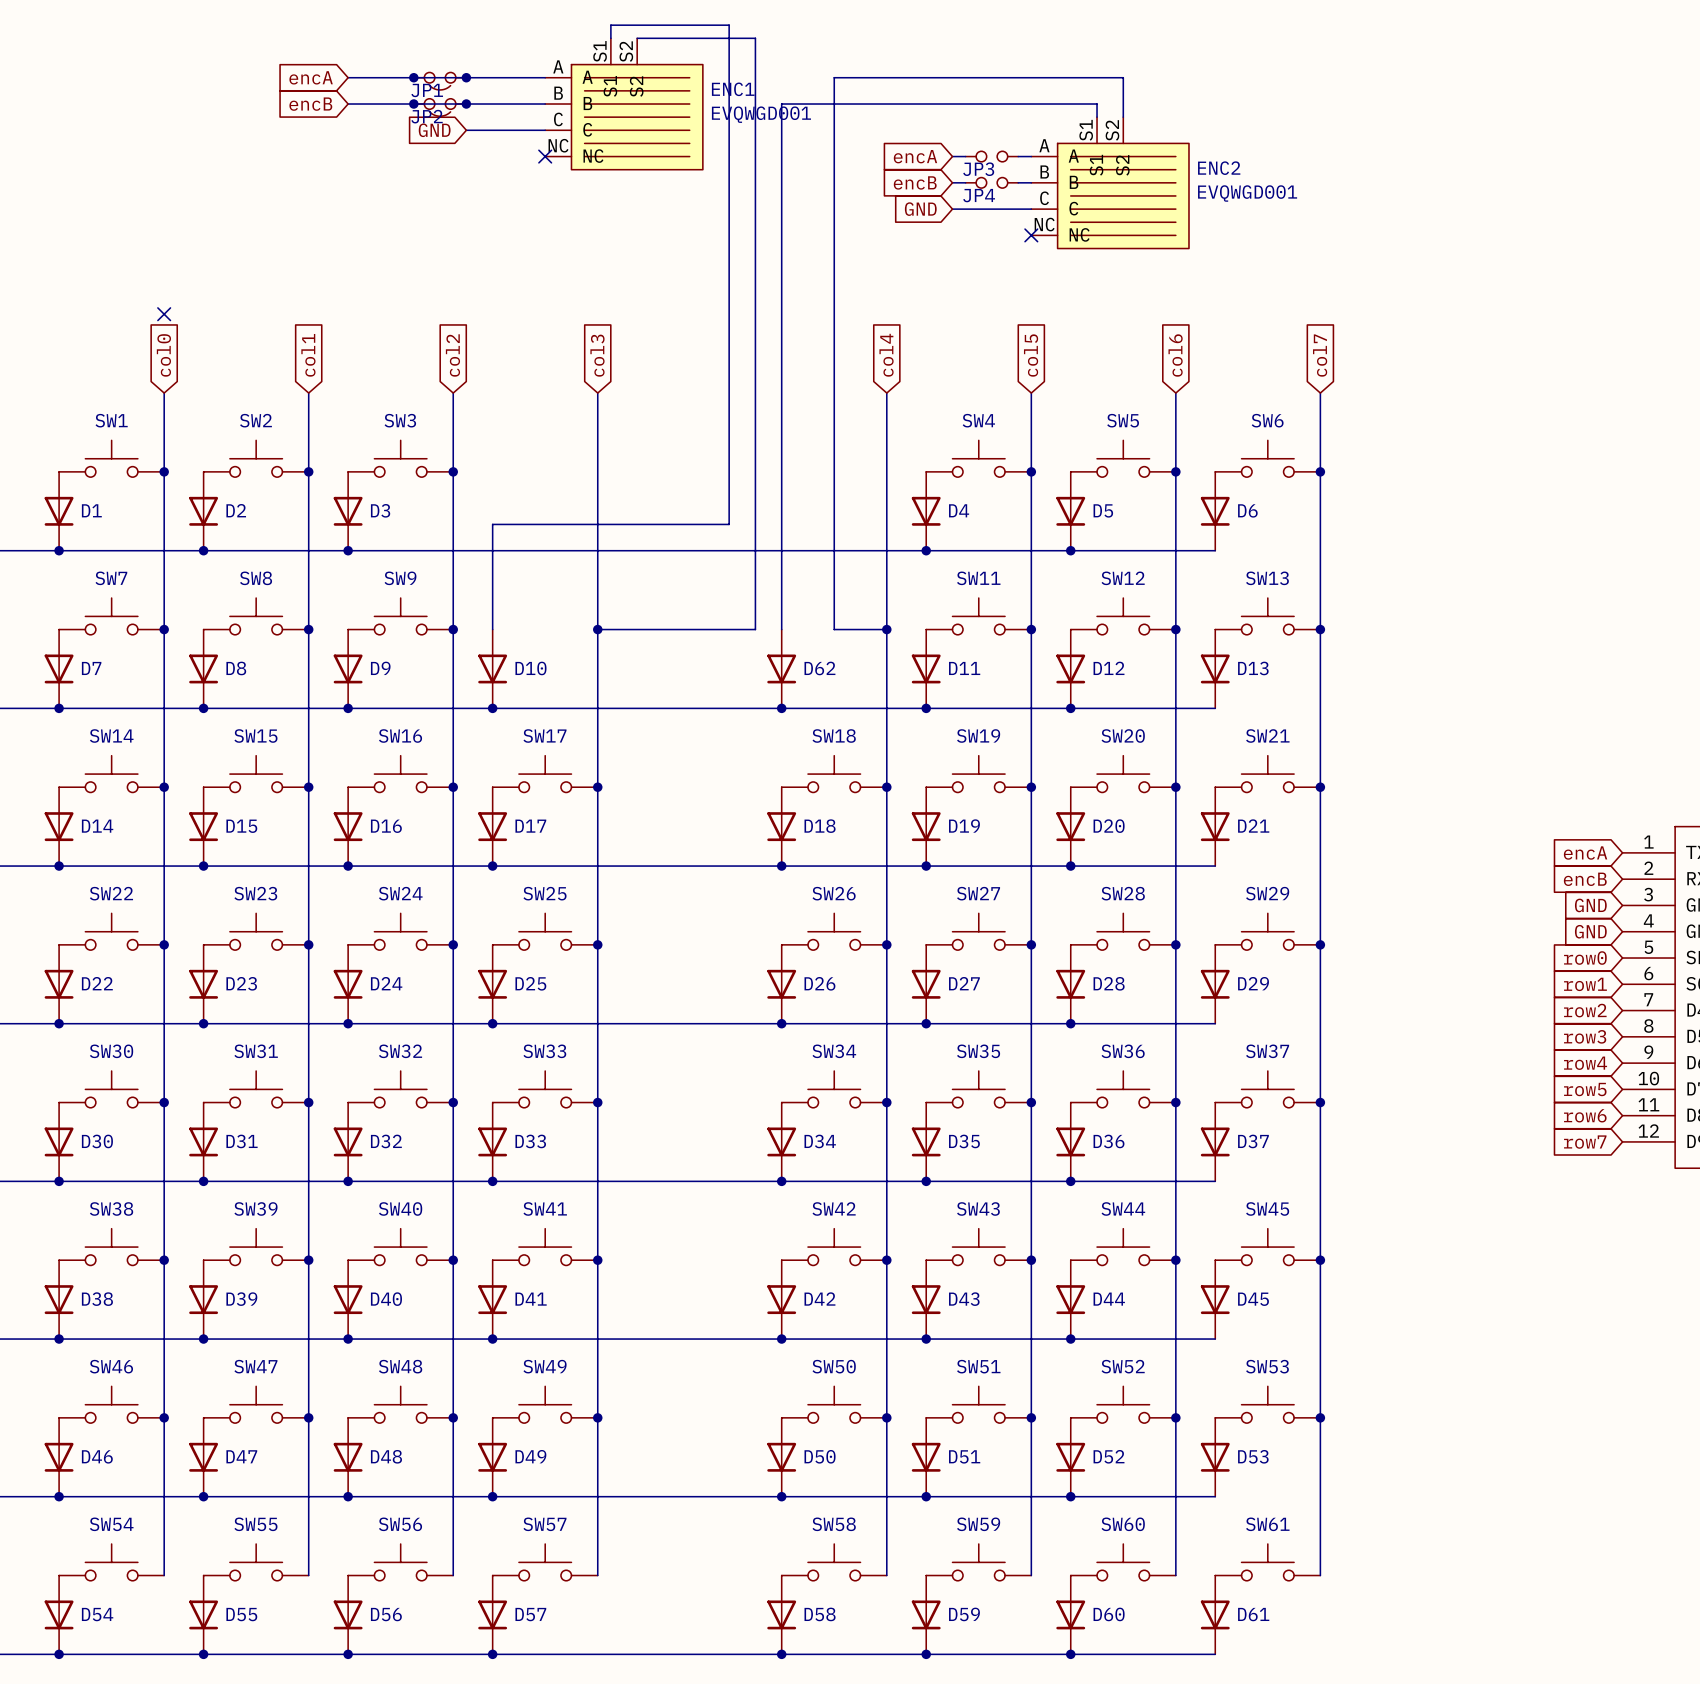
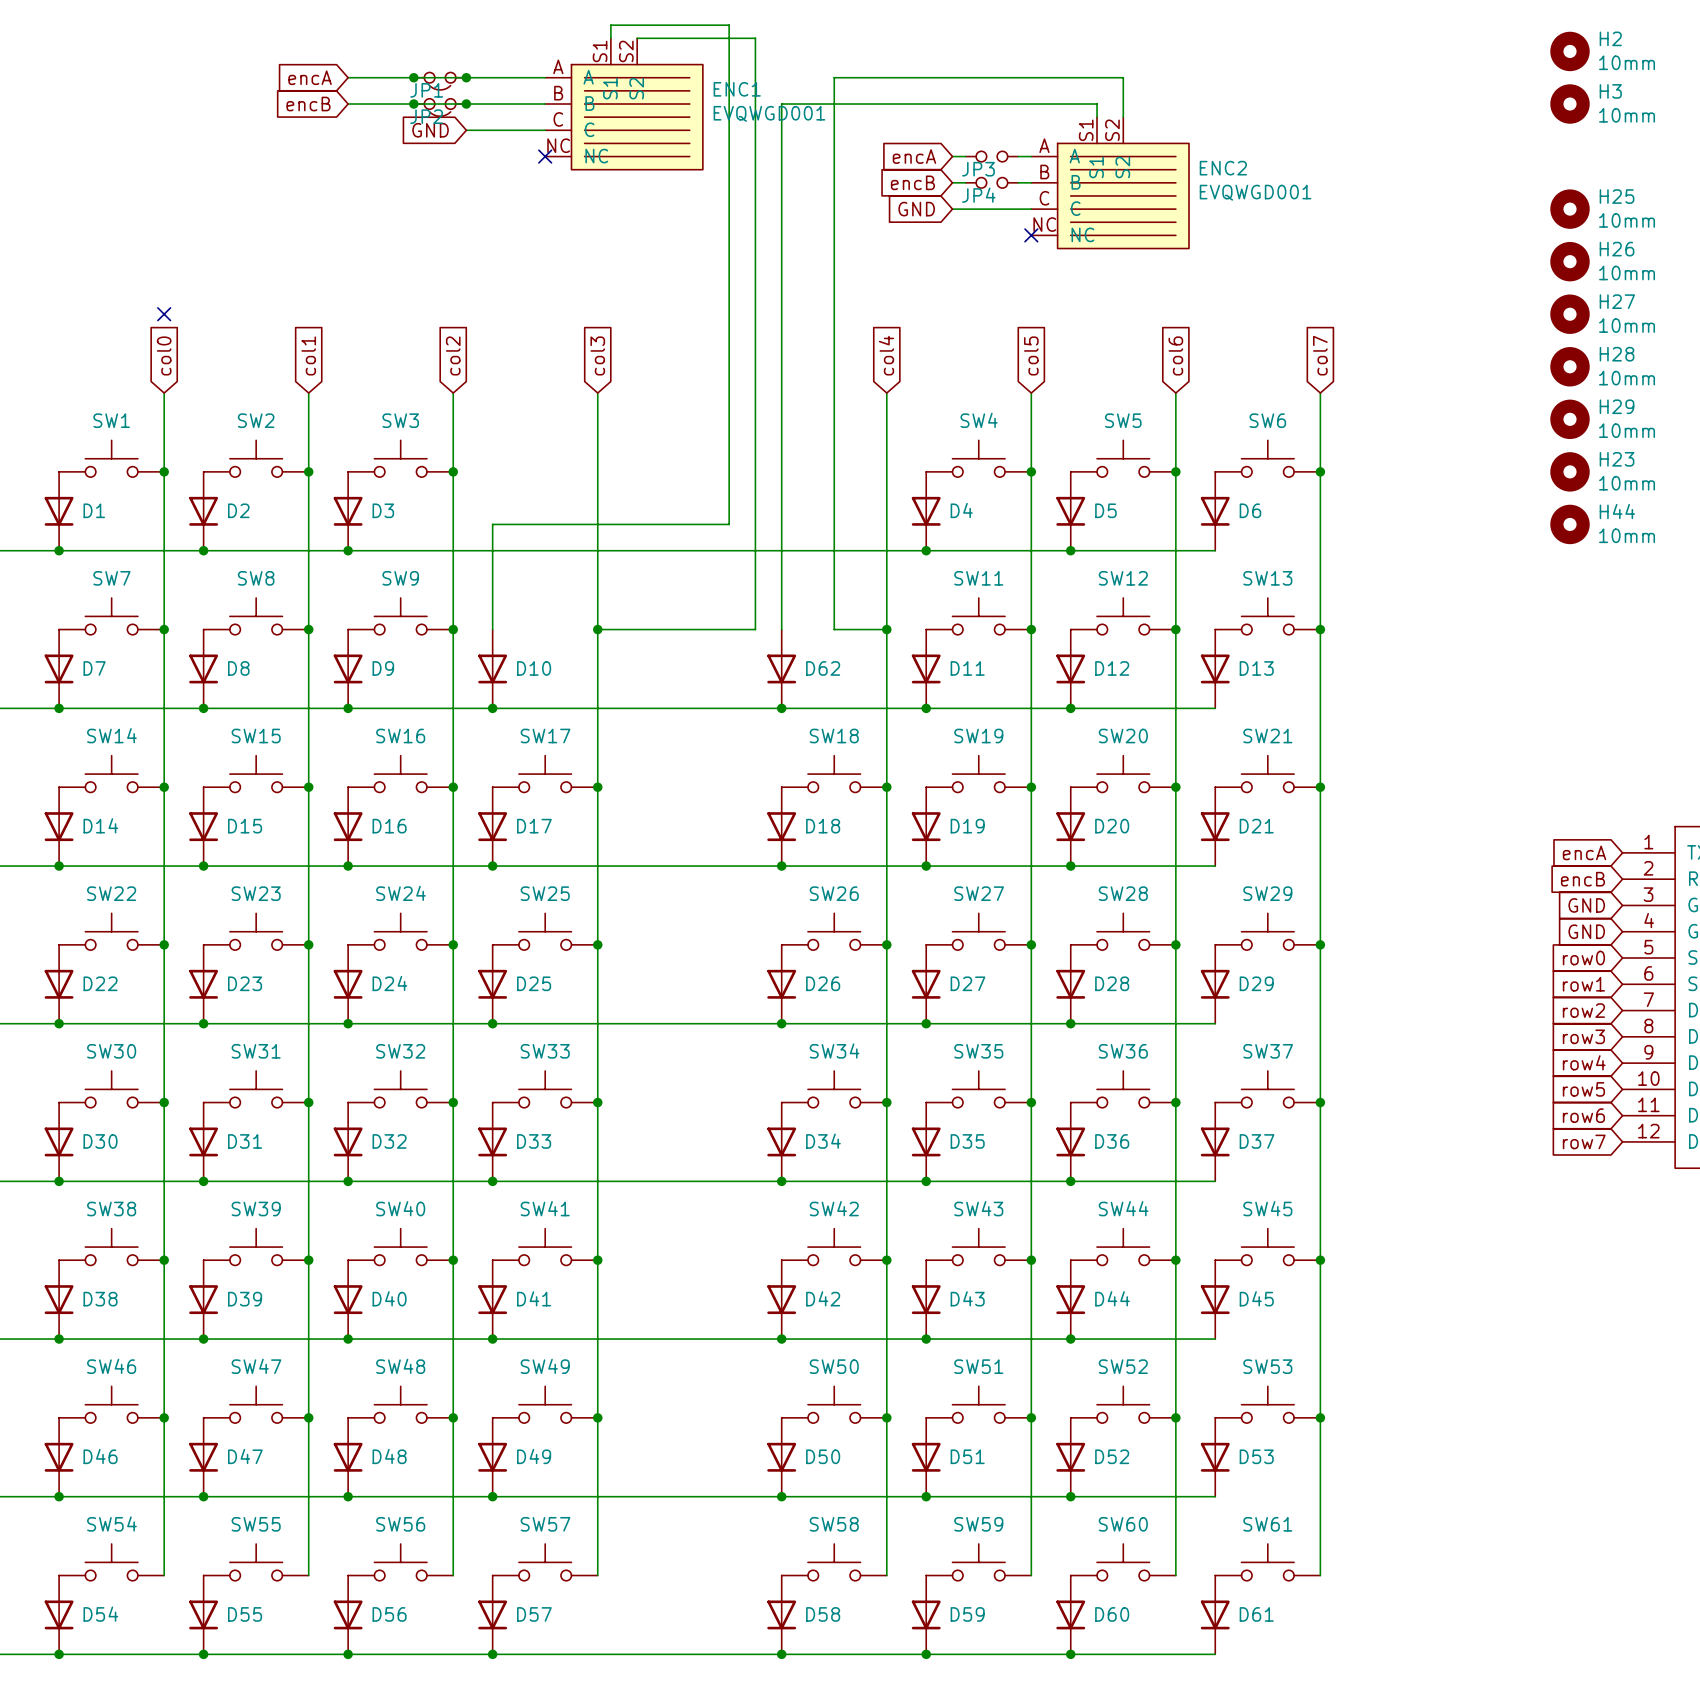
H2: none -> 10mm (1570, 51)
H3: none -> 10mm (1570, 104)
H25: none -> 10mm (1570, 209)
H26: none -> 10mm (1570, 261)
H27: none -> 10mm (1570, 314)
H28: none -> 10mm (1570, 366)
H29: none -> 10mm (1570, 419)
H23: none -> 10mm (1570, 471)
H44: none -> 10mm (1570, 524)

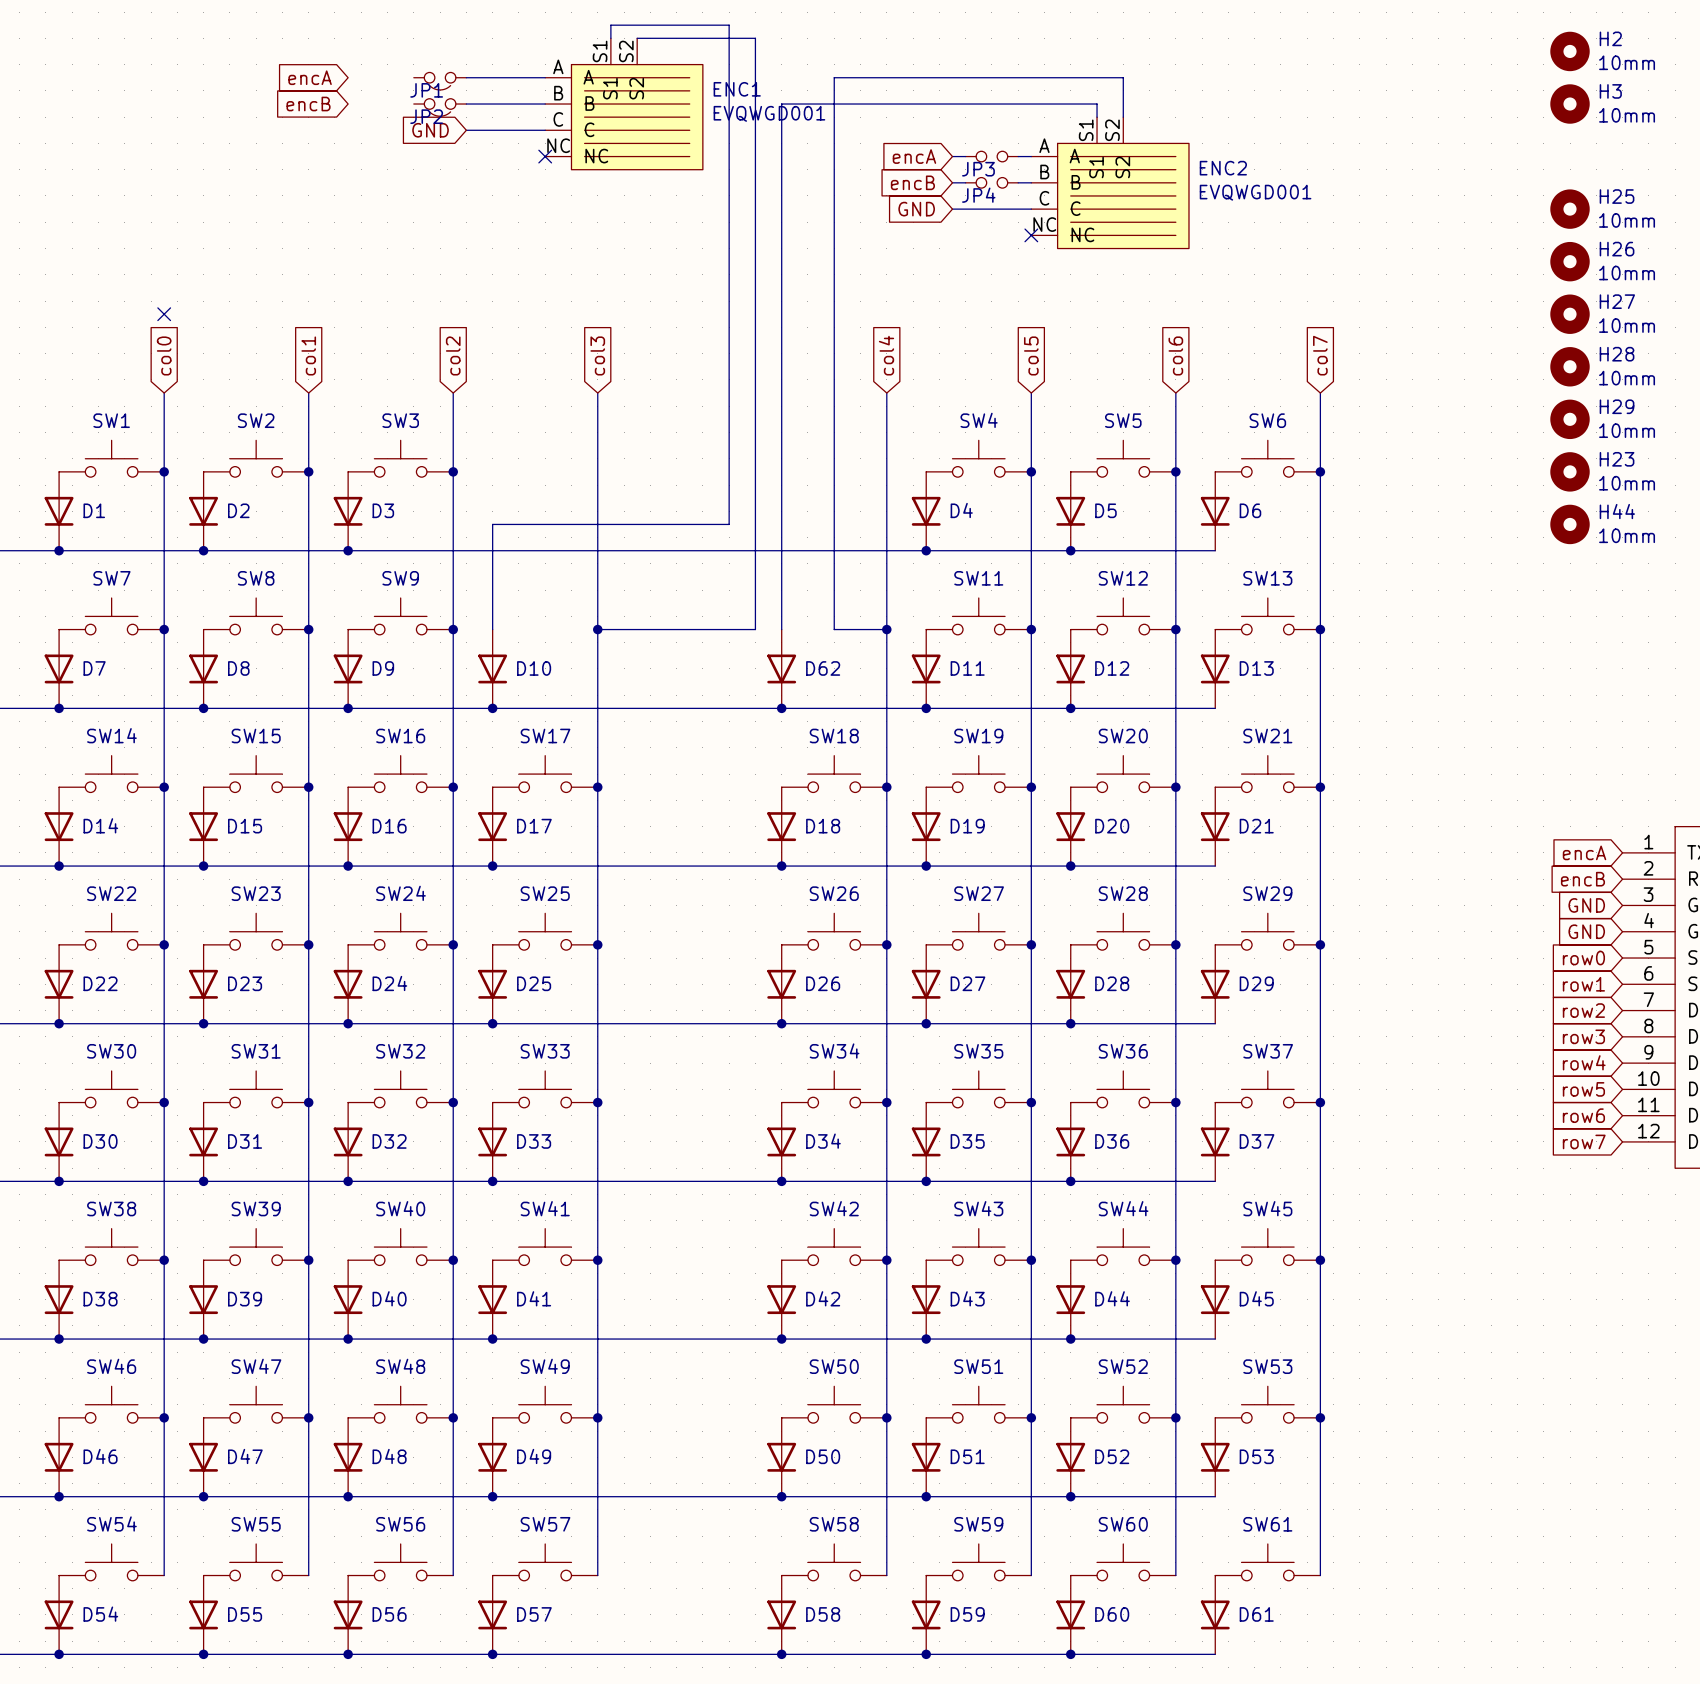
wire: (348, 77) (466, 77) -> none
junction: (413, 77) -> none
junction: (466, 77) -> none
wire: (348, 104) (466, 104) -> none
junction: (413, 104) -> none
junction: (466, 104) -> none

